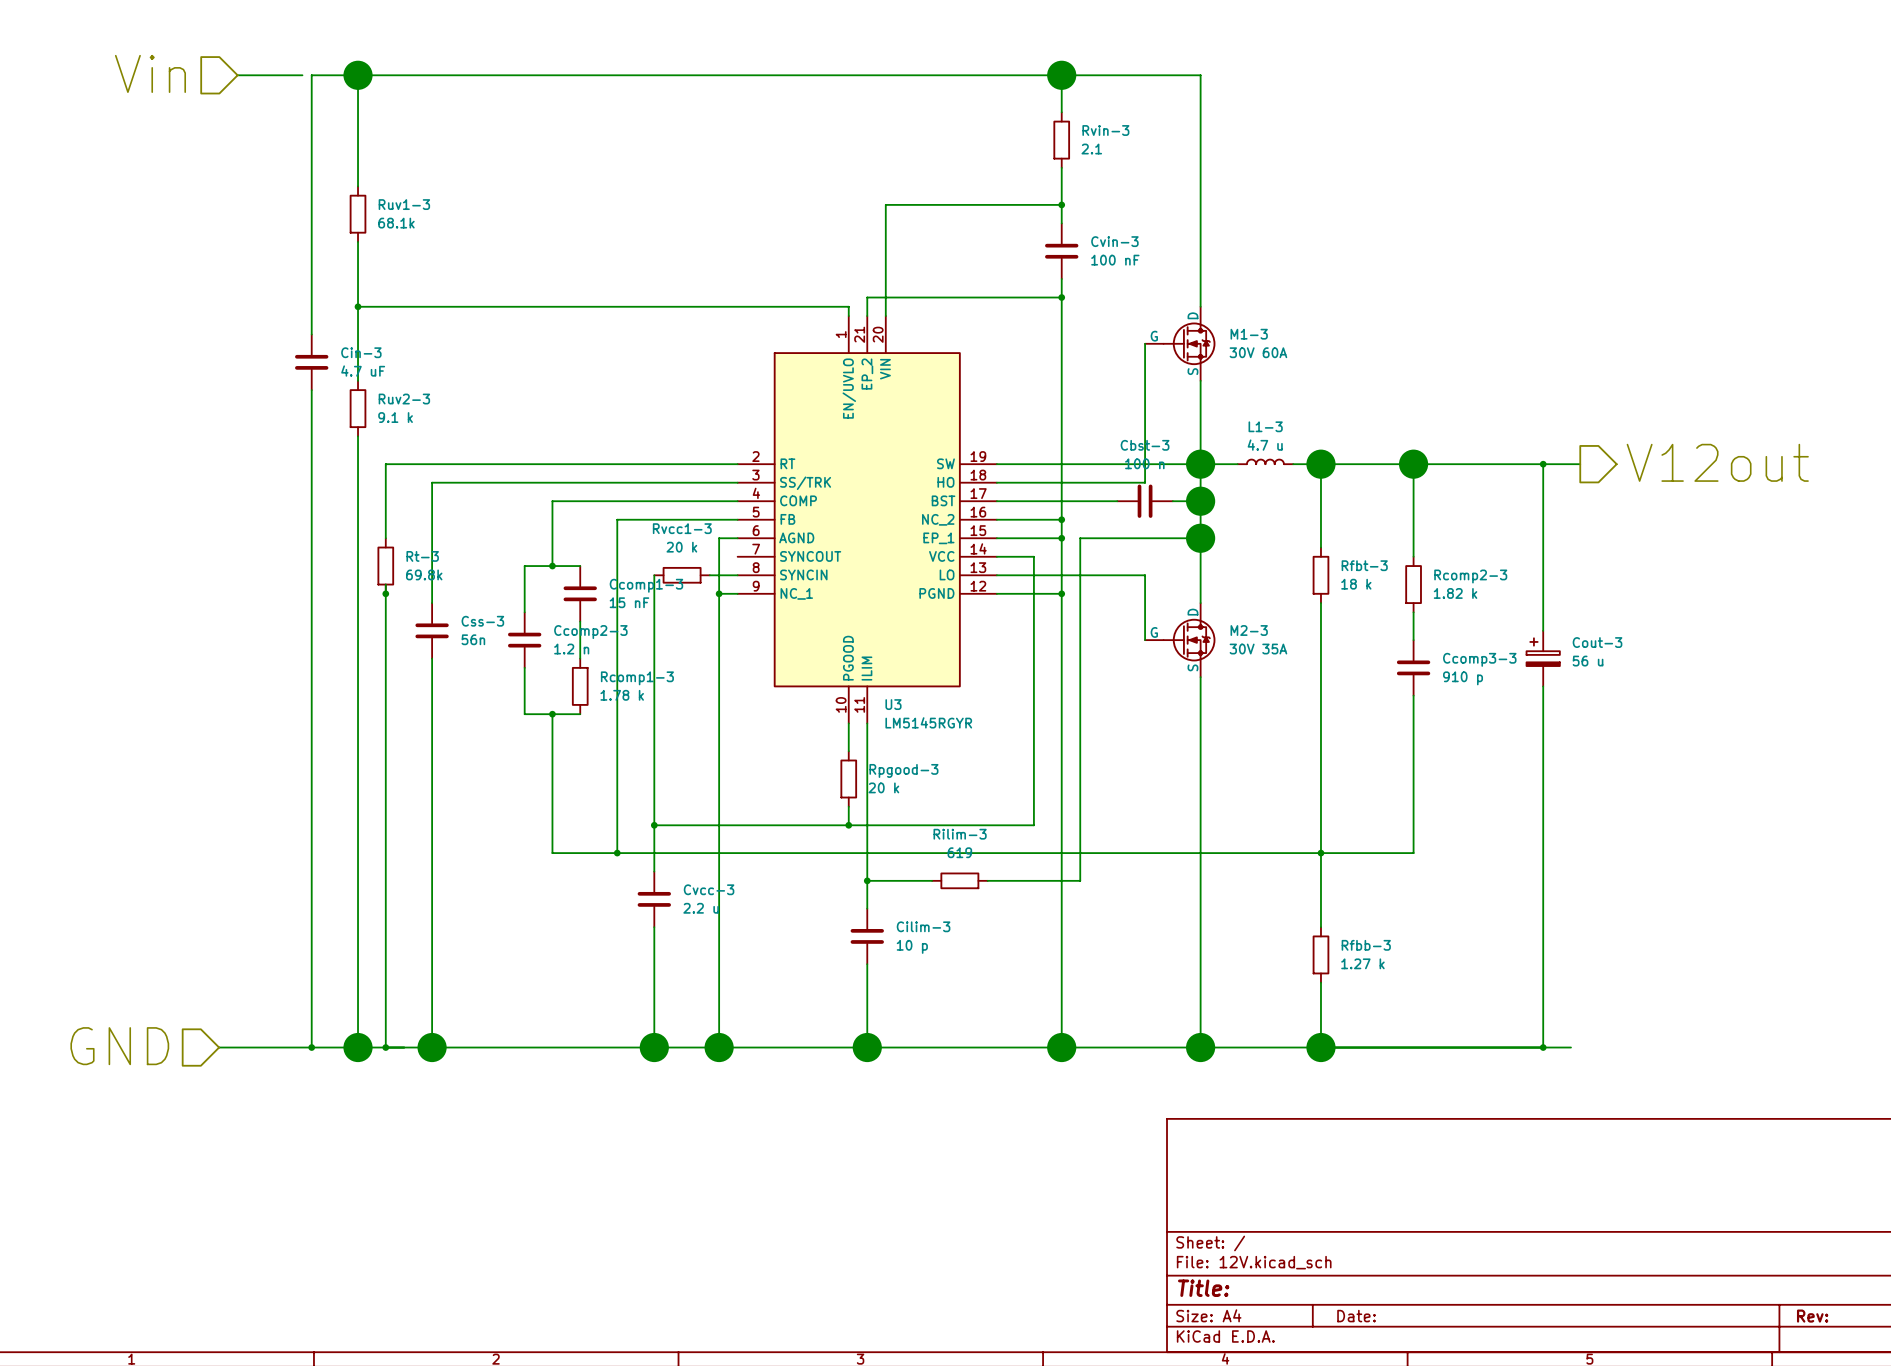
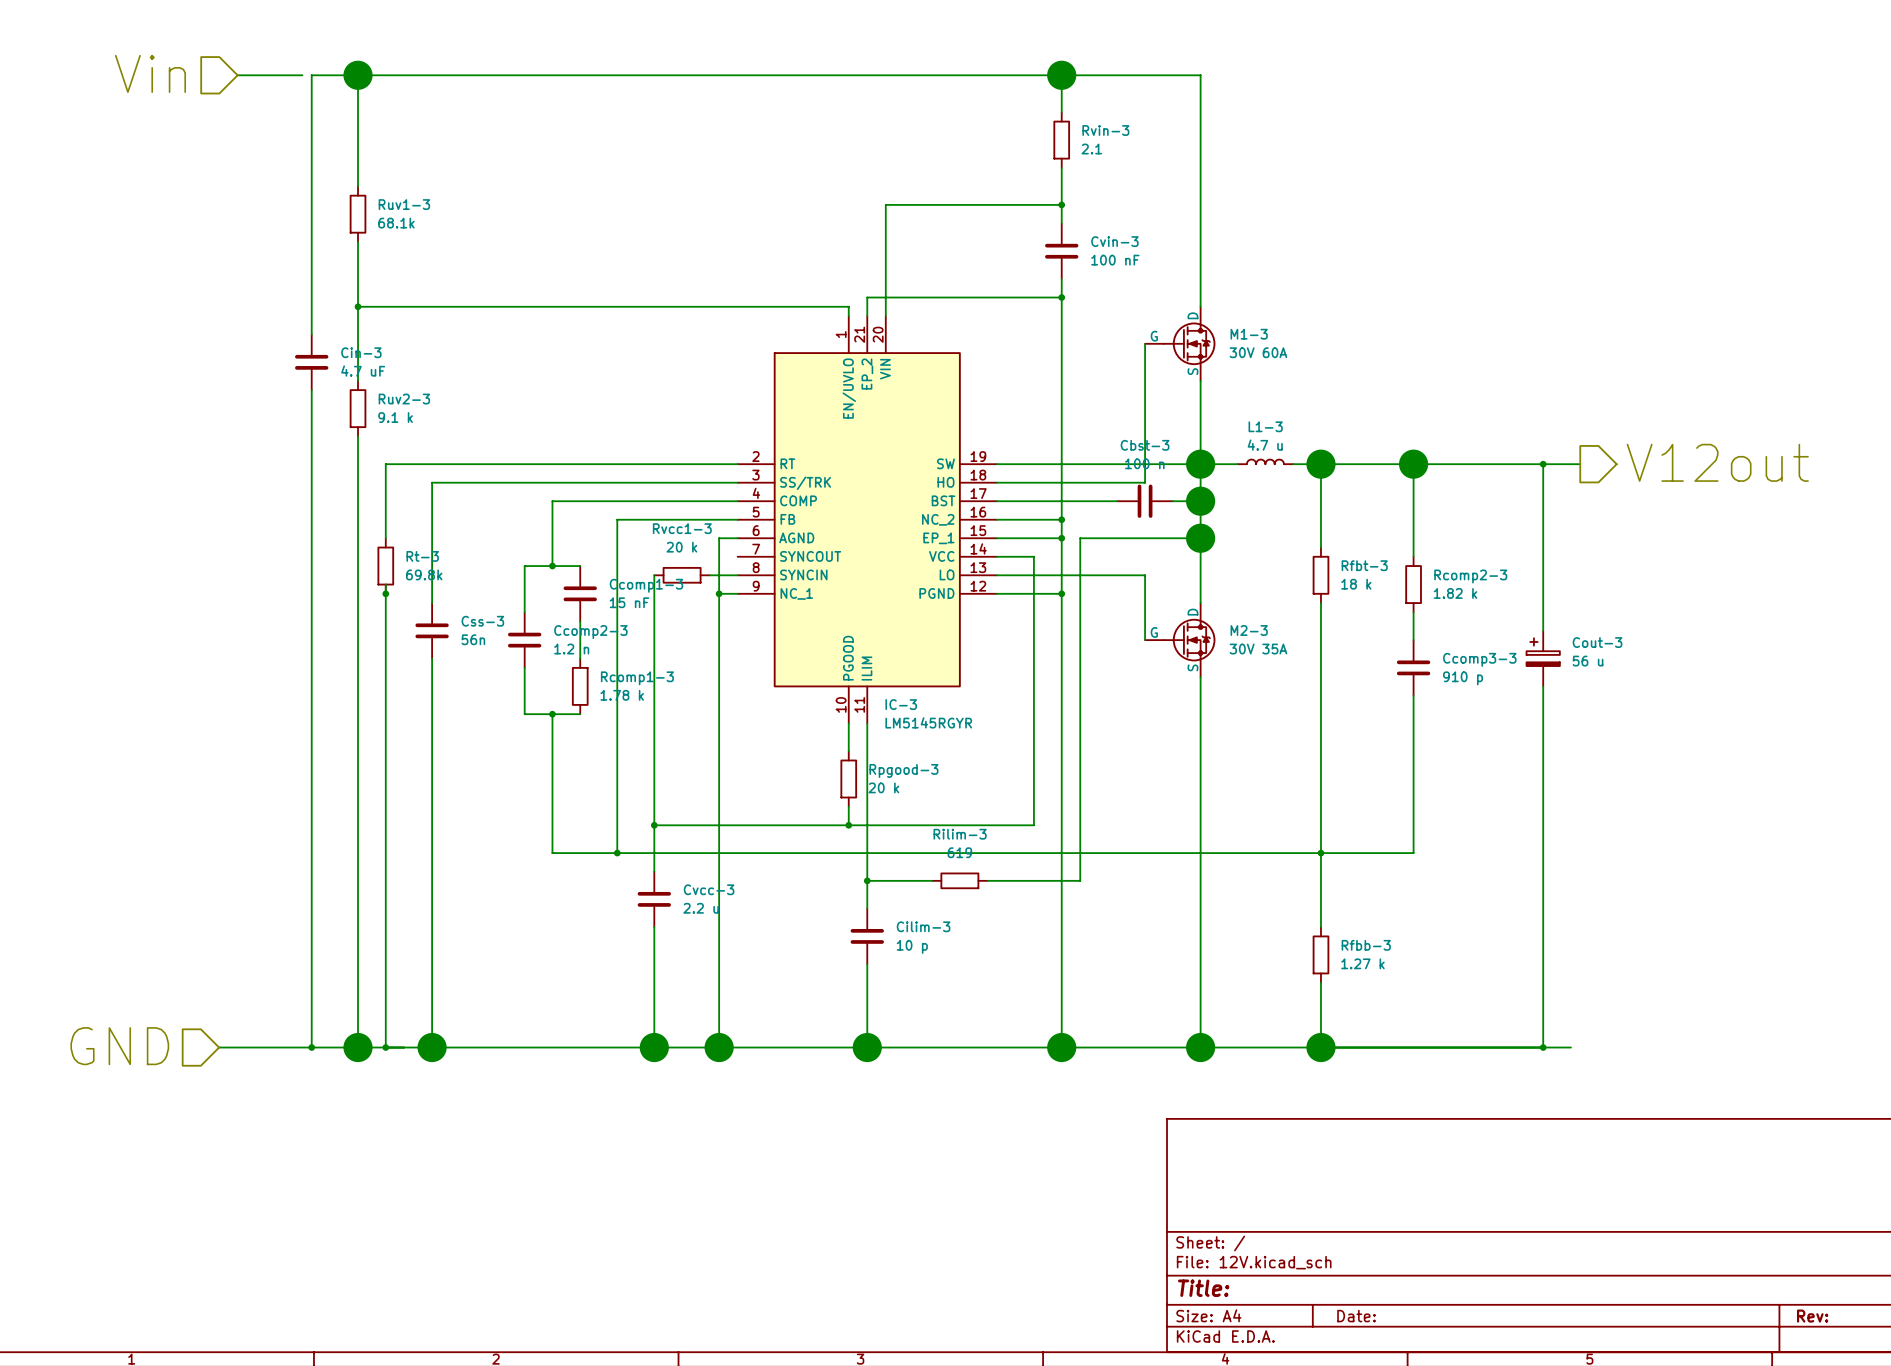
U3 name: U3 (893, 704) -> IC-3 (901, 704)

